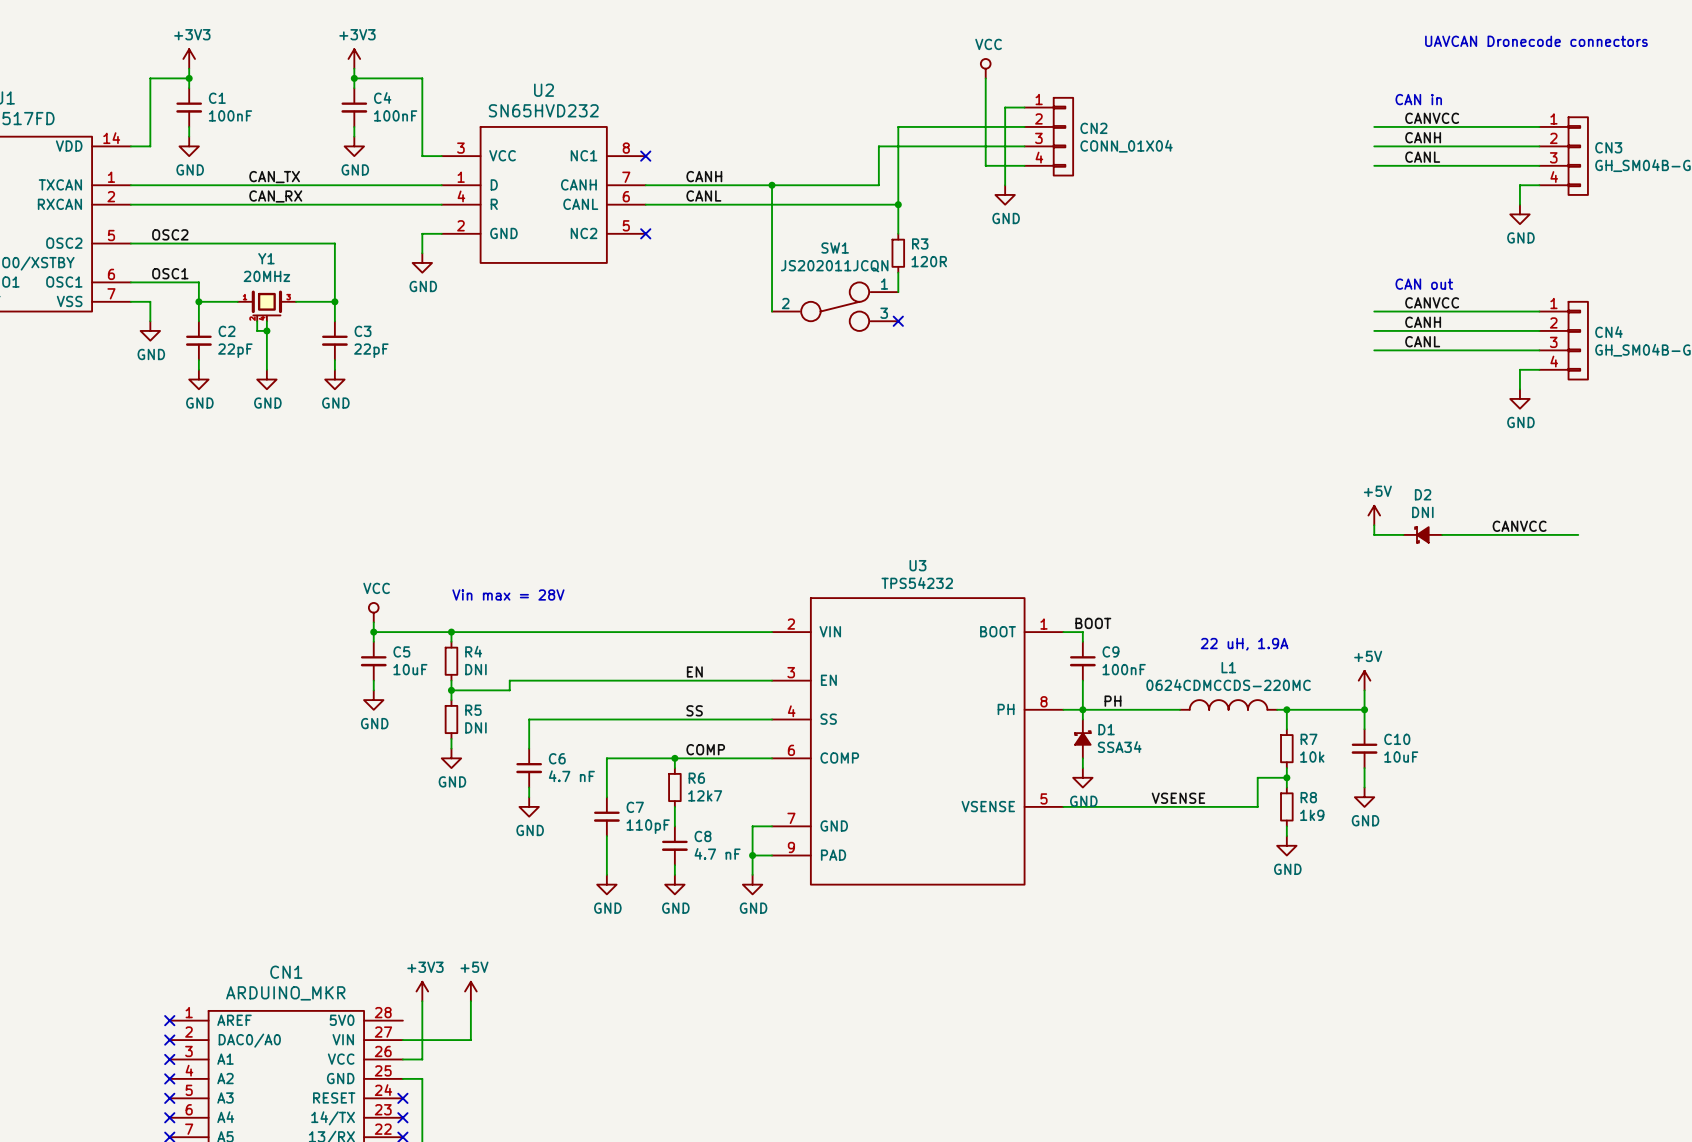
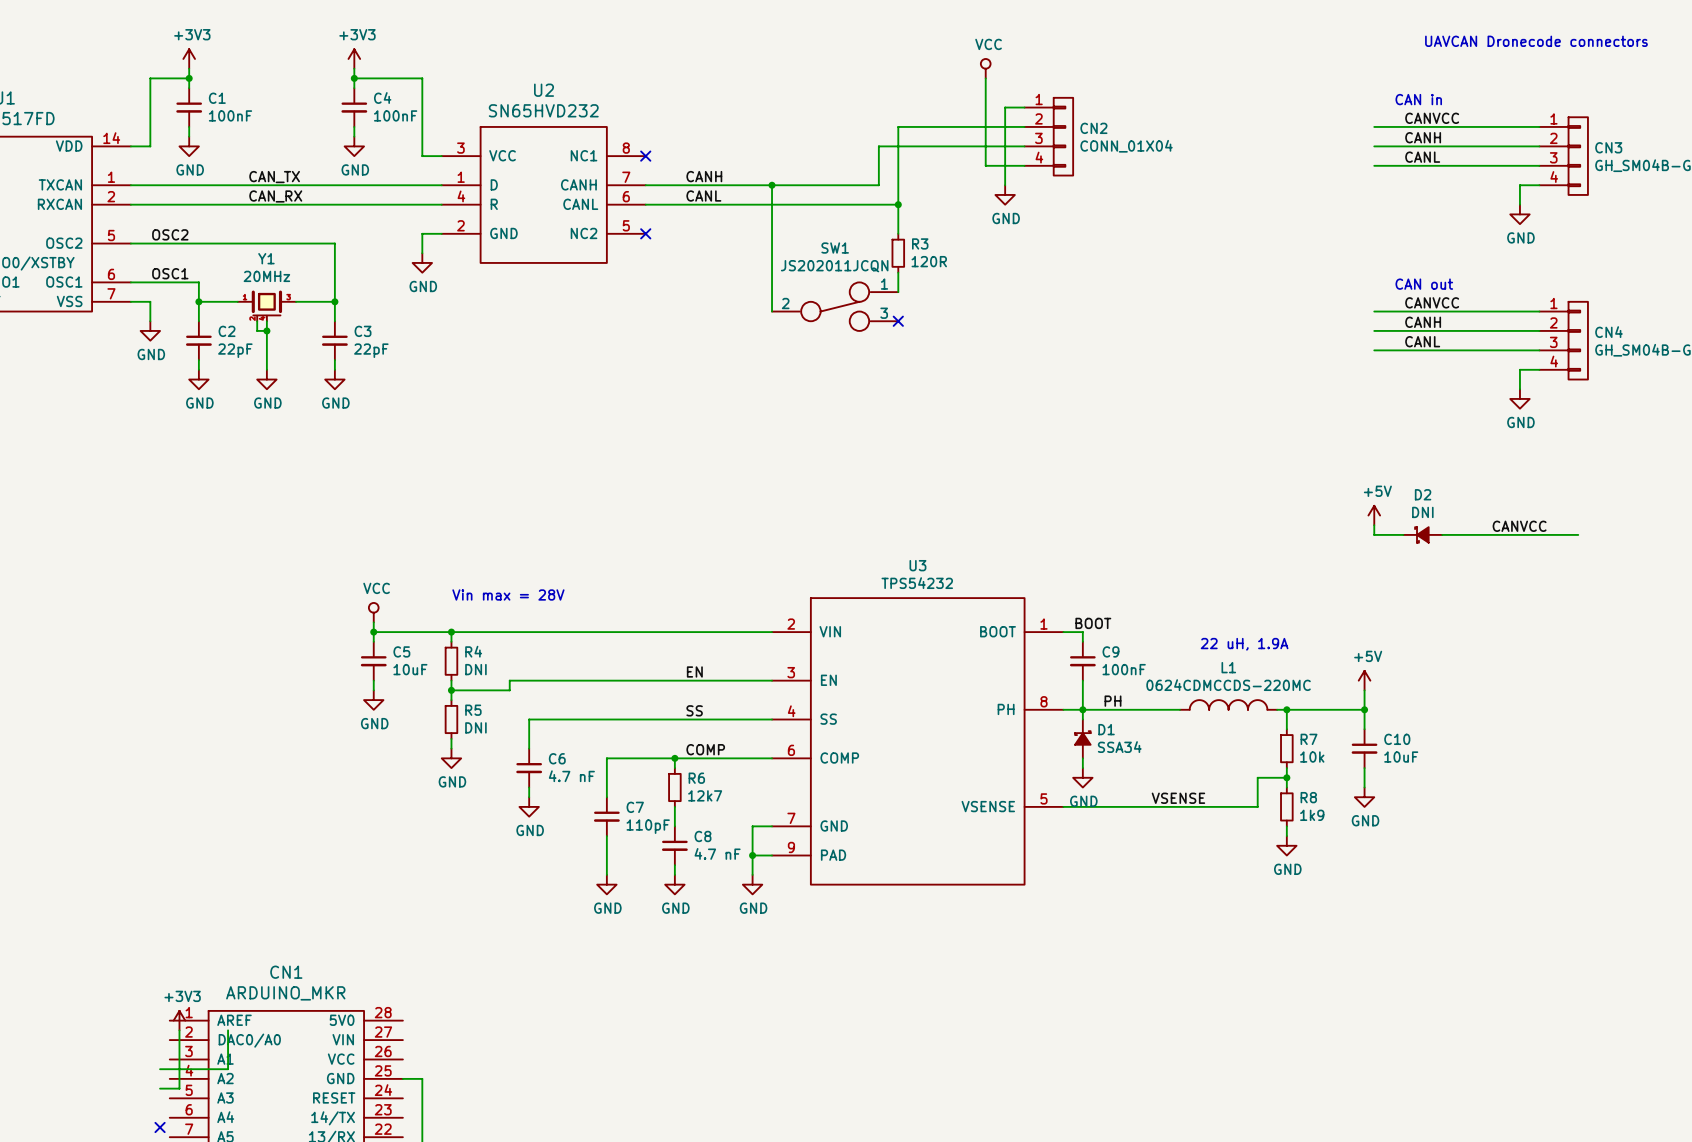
power symbol: +3V3 (422, 991) -> none
power symbol: +5V (470, 991) -> none
wire: (422, 1001) (422, 1059) (402, 1059) -> none
wire: (470, 1001) (470, 1040) (402, 1040) -> none
no-connect mark: (169, 1020) -> none
power symbol: none -> +3V3 (179, 1020)
wire: none -> (179, 1030) (179, 1088) (160, 1088)
wire: none -> (228, 1030) (228, 1069) (160, 1069)
no-connect mark: (169, 1040) -> none
no-connect mark: (169, 1059) -> none
no-connect mark: (169, 1078) -> none
no-connect mark: (169, 1098) -> none
no-connect mark: (402, 1098) -> none
no-connect mark: (169, 1117) -> none
no-connect mark: (402, 1117) -> none
no-connect mark: none -> (160, 1127)
no-connect mark: (169, 1137) -> none
no-connect mark: (402, 1137) -> none

